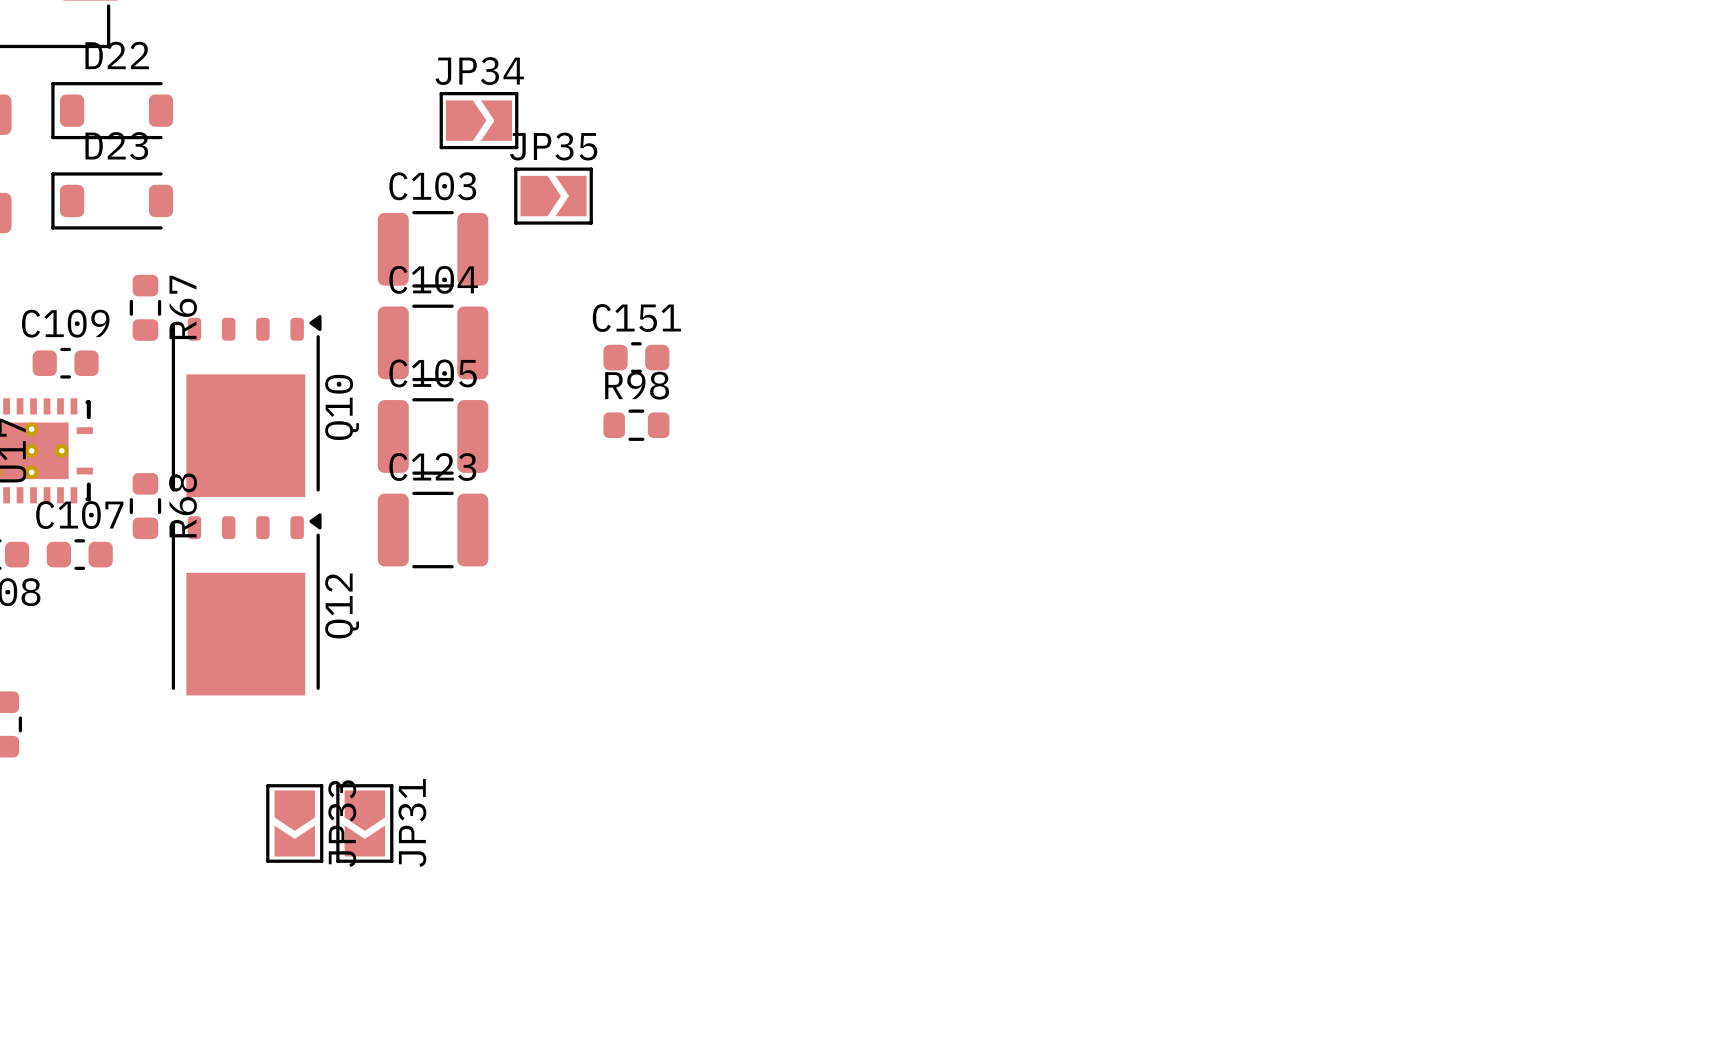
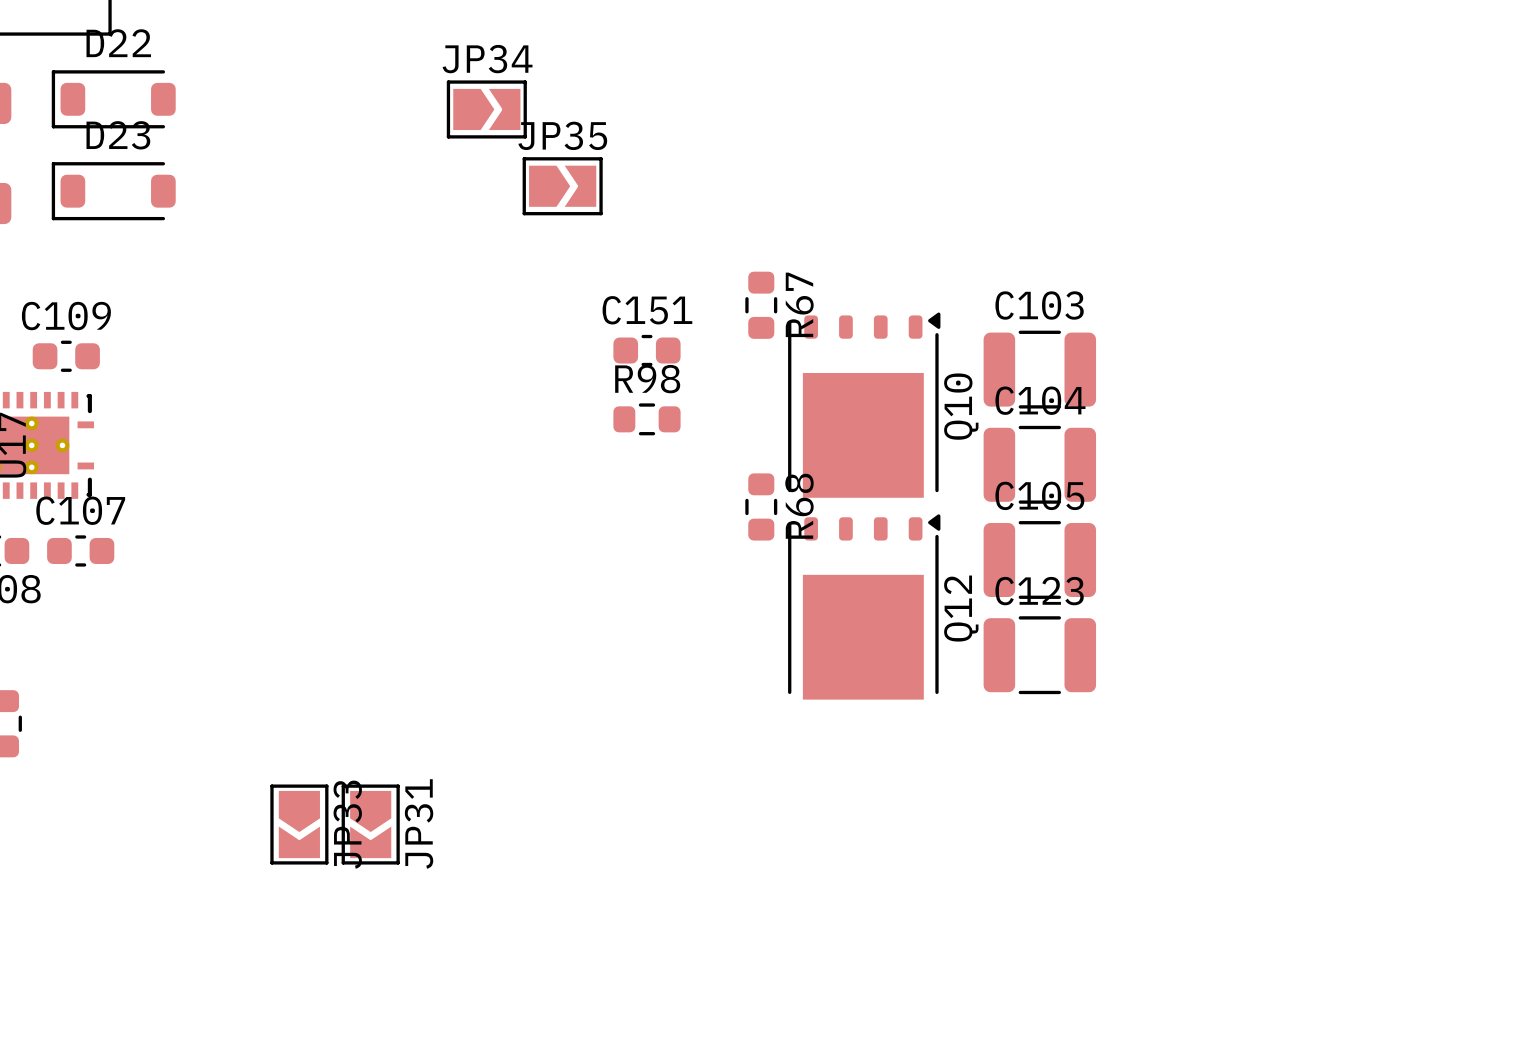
C103 position: (433, 249) -> (1039, 369)
R67 position: (145, 307) -> (761, 305)
C104 position: (433, 342) -> (1039, 464)
Q10 position: (246, 405) -> (864, 405)
C105 position: (433, 436) -> (1039, 559)
R68 position: (145, 506) -> (761, 506)
C123 position: (433, 530) -> (1039, 655)
Q12 position: (246, 604) -> (864, 606)

